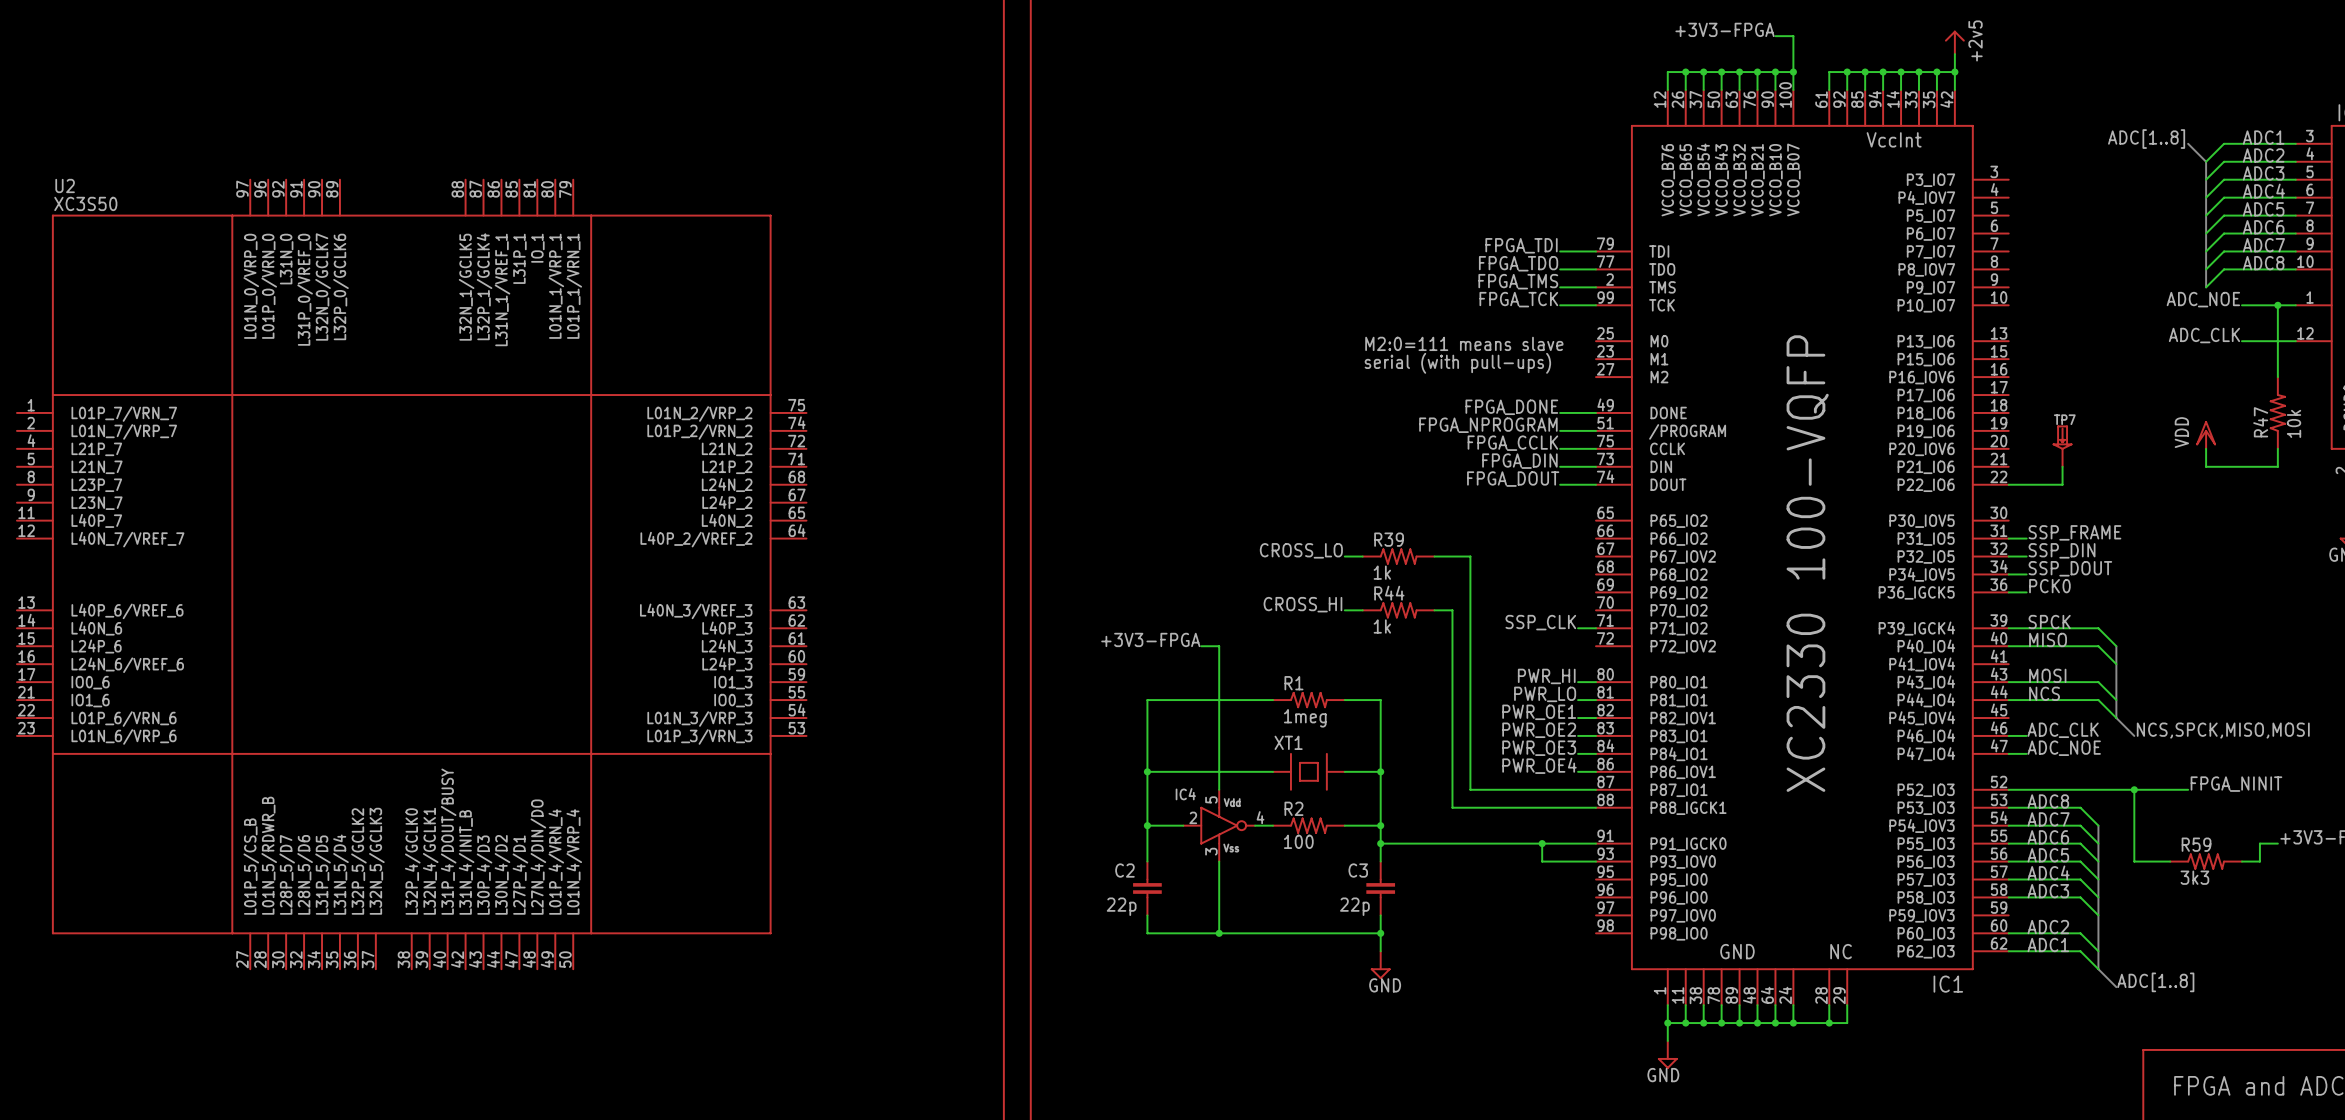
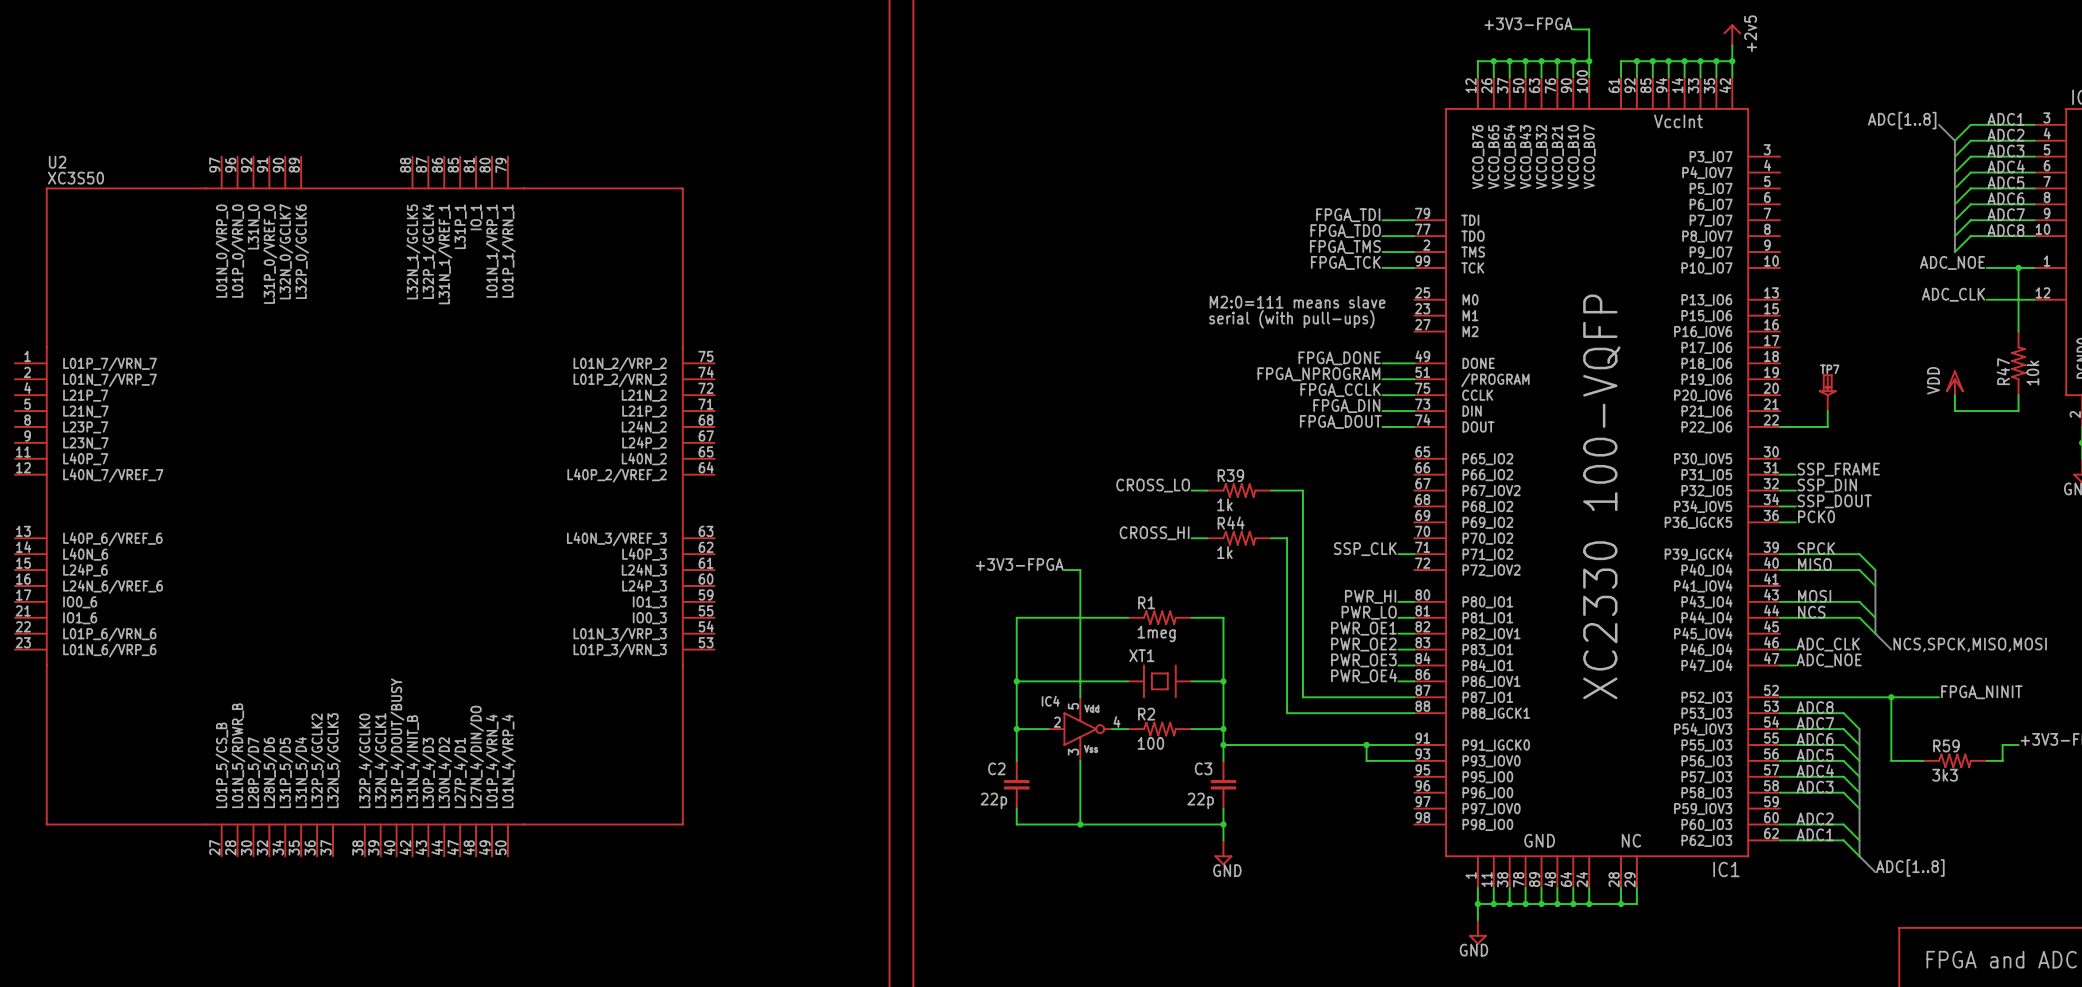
U2 symbol: [16, 179, 807, 970] -> [14, 156, 715, 857]

